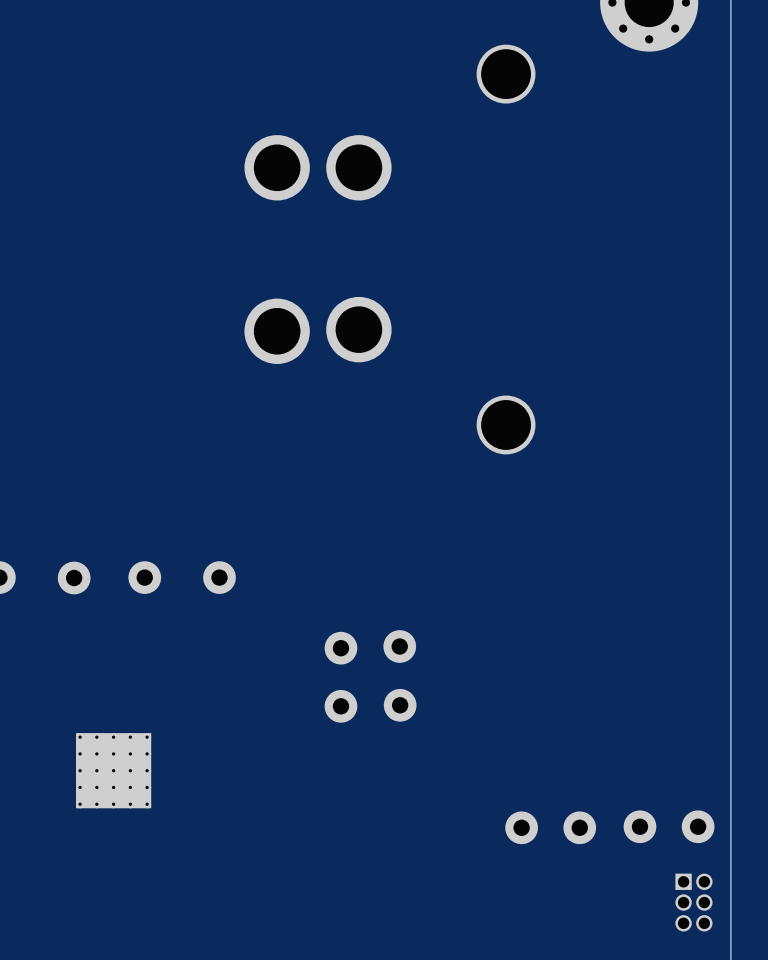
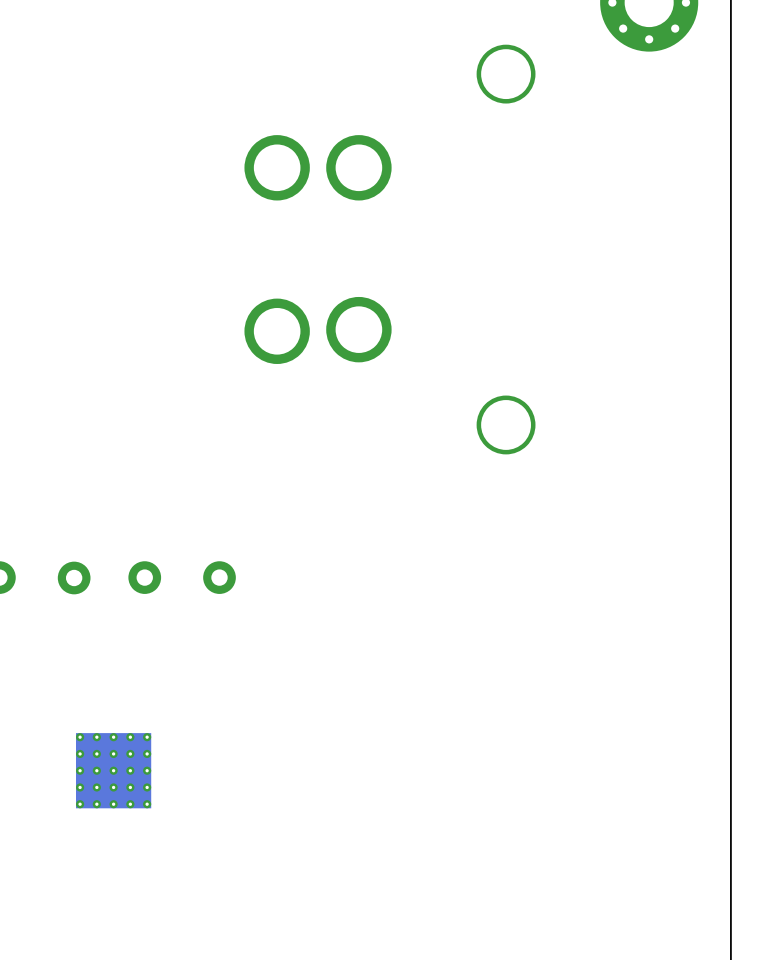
part: (399, 646) -> none
part: (340, 648) -> none
part: (400, 705) -> none
part: (340, 706) -> none
part: (639, 826) -> none
part: (698, 826) -> none
part: (521, 827) -> none
part: (579, 827) -> none
part: (693, 902) -> none

